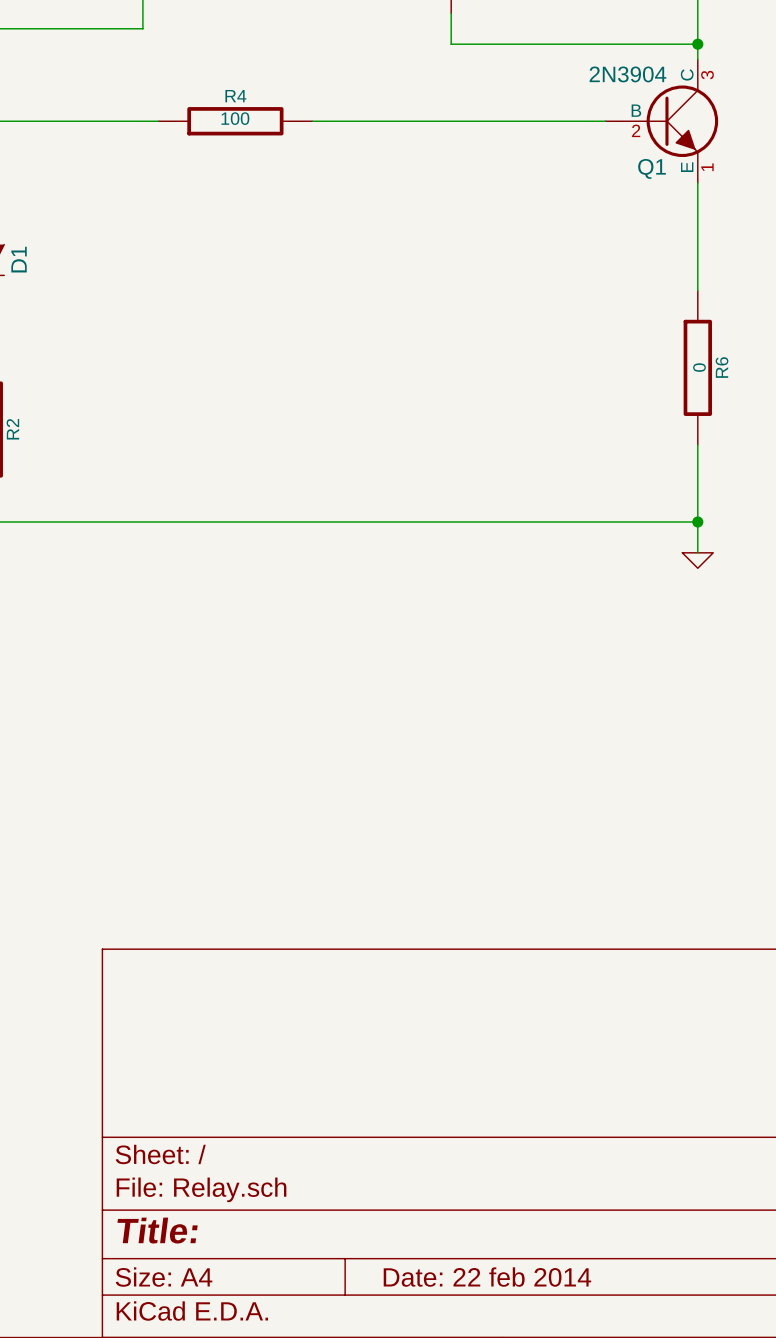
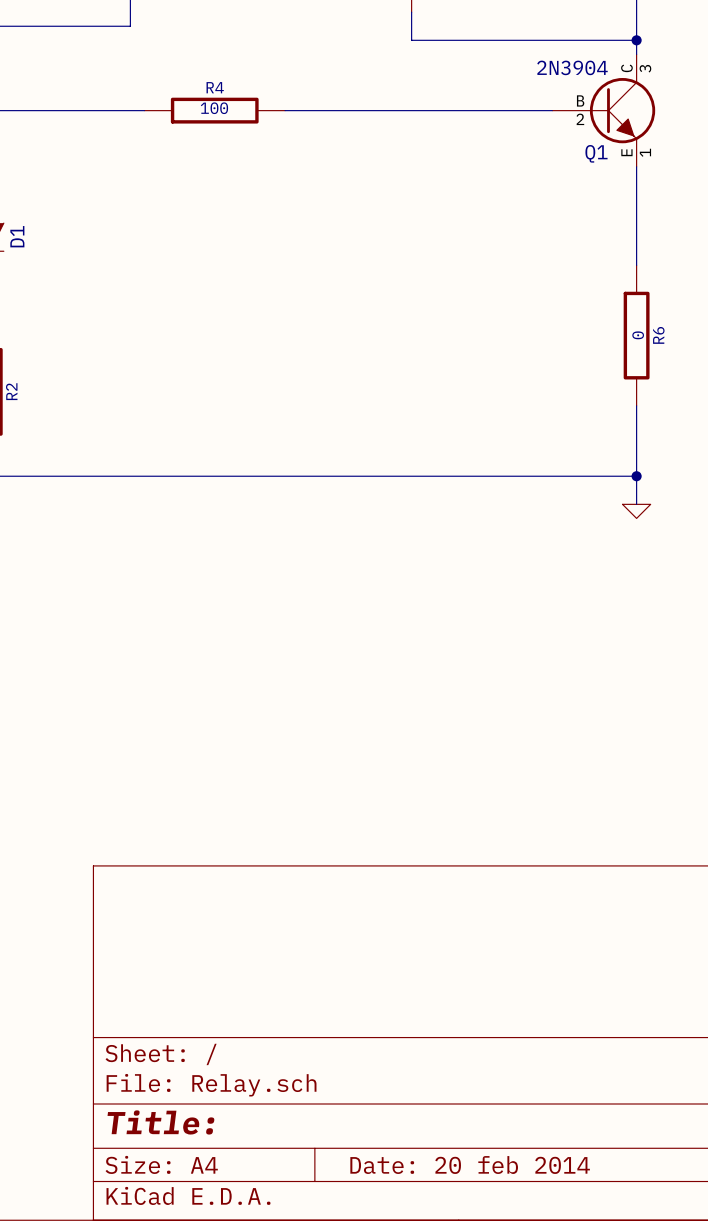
title block: Date: 22 feb 2014 (487, 1277) -> Date: 20 feb 2014 (470, 1165)

